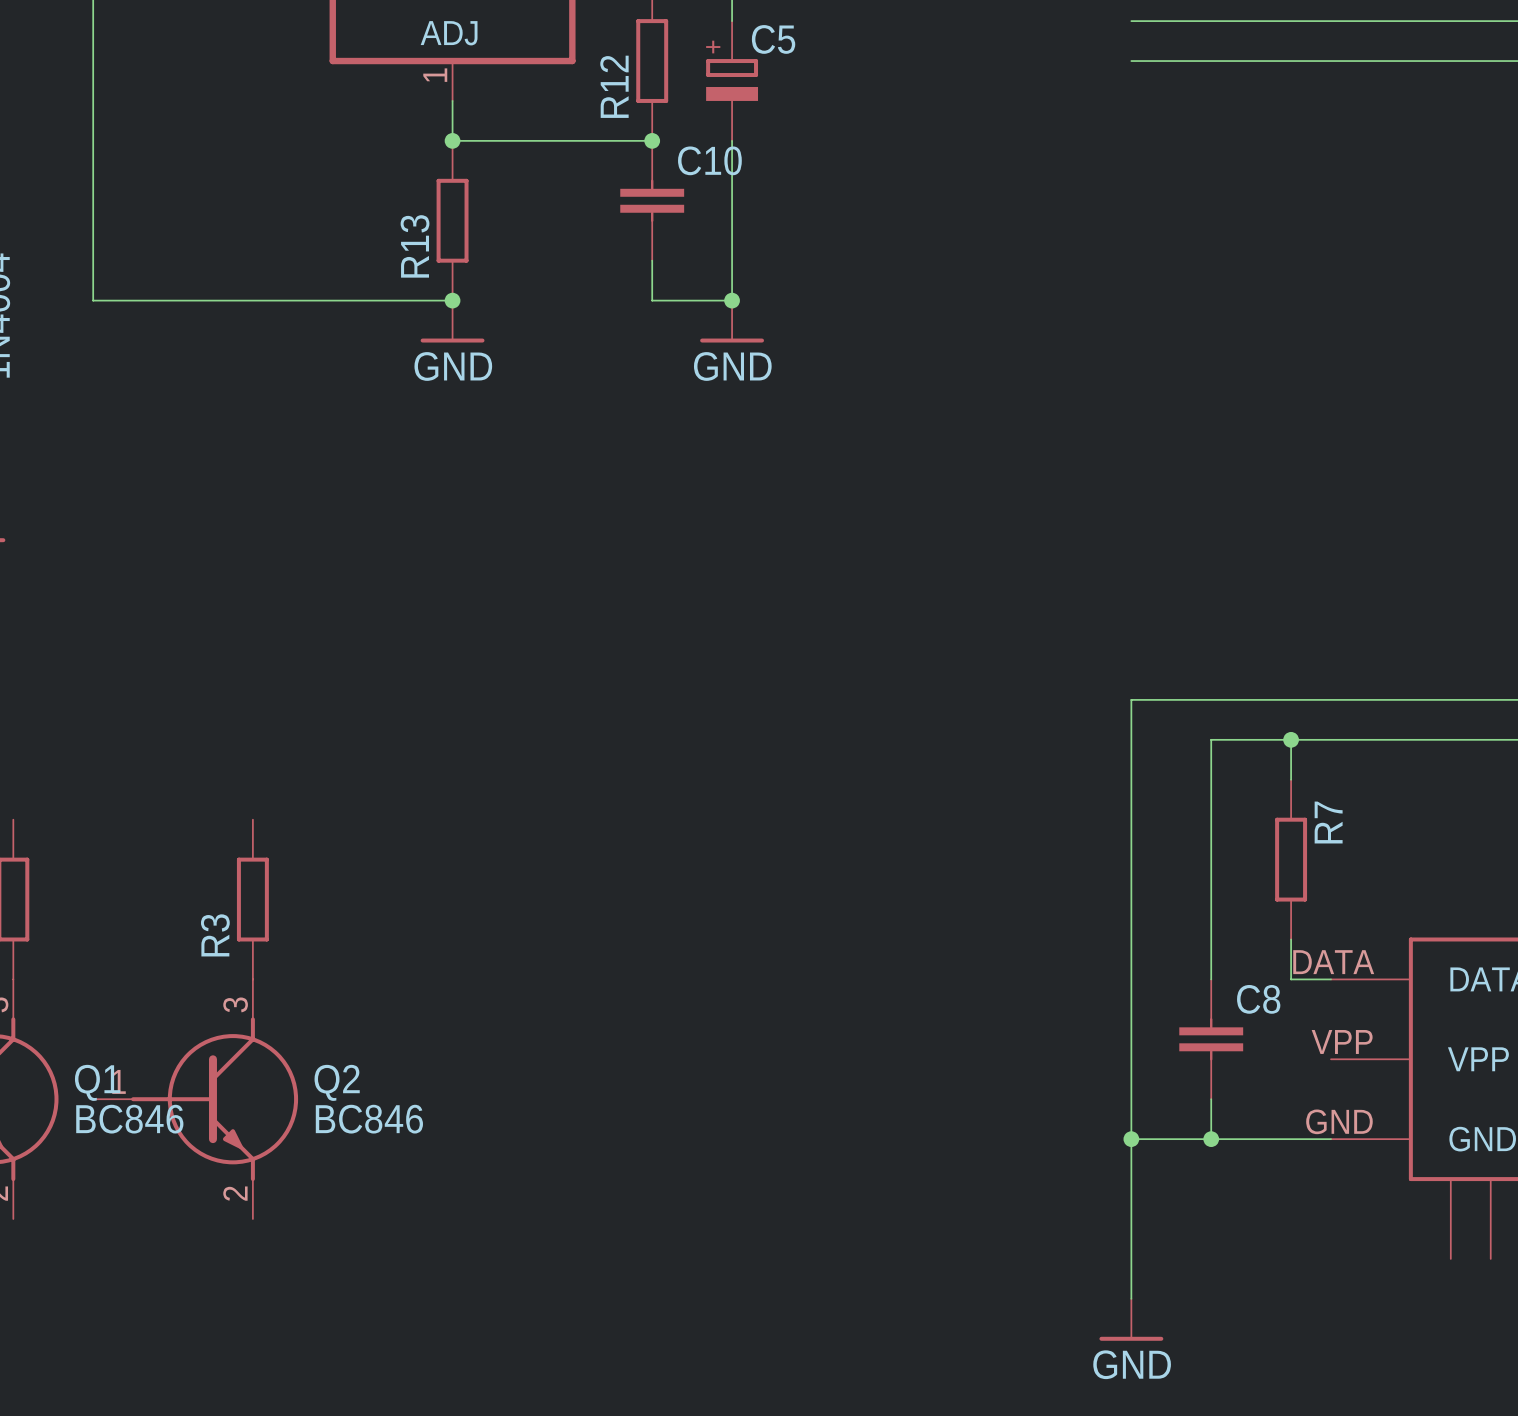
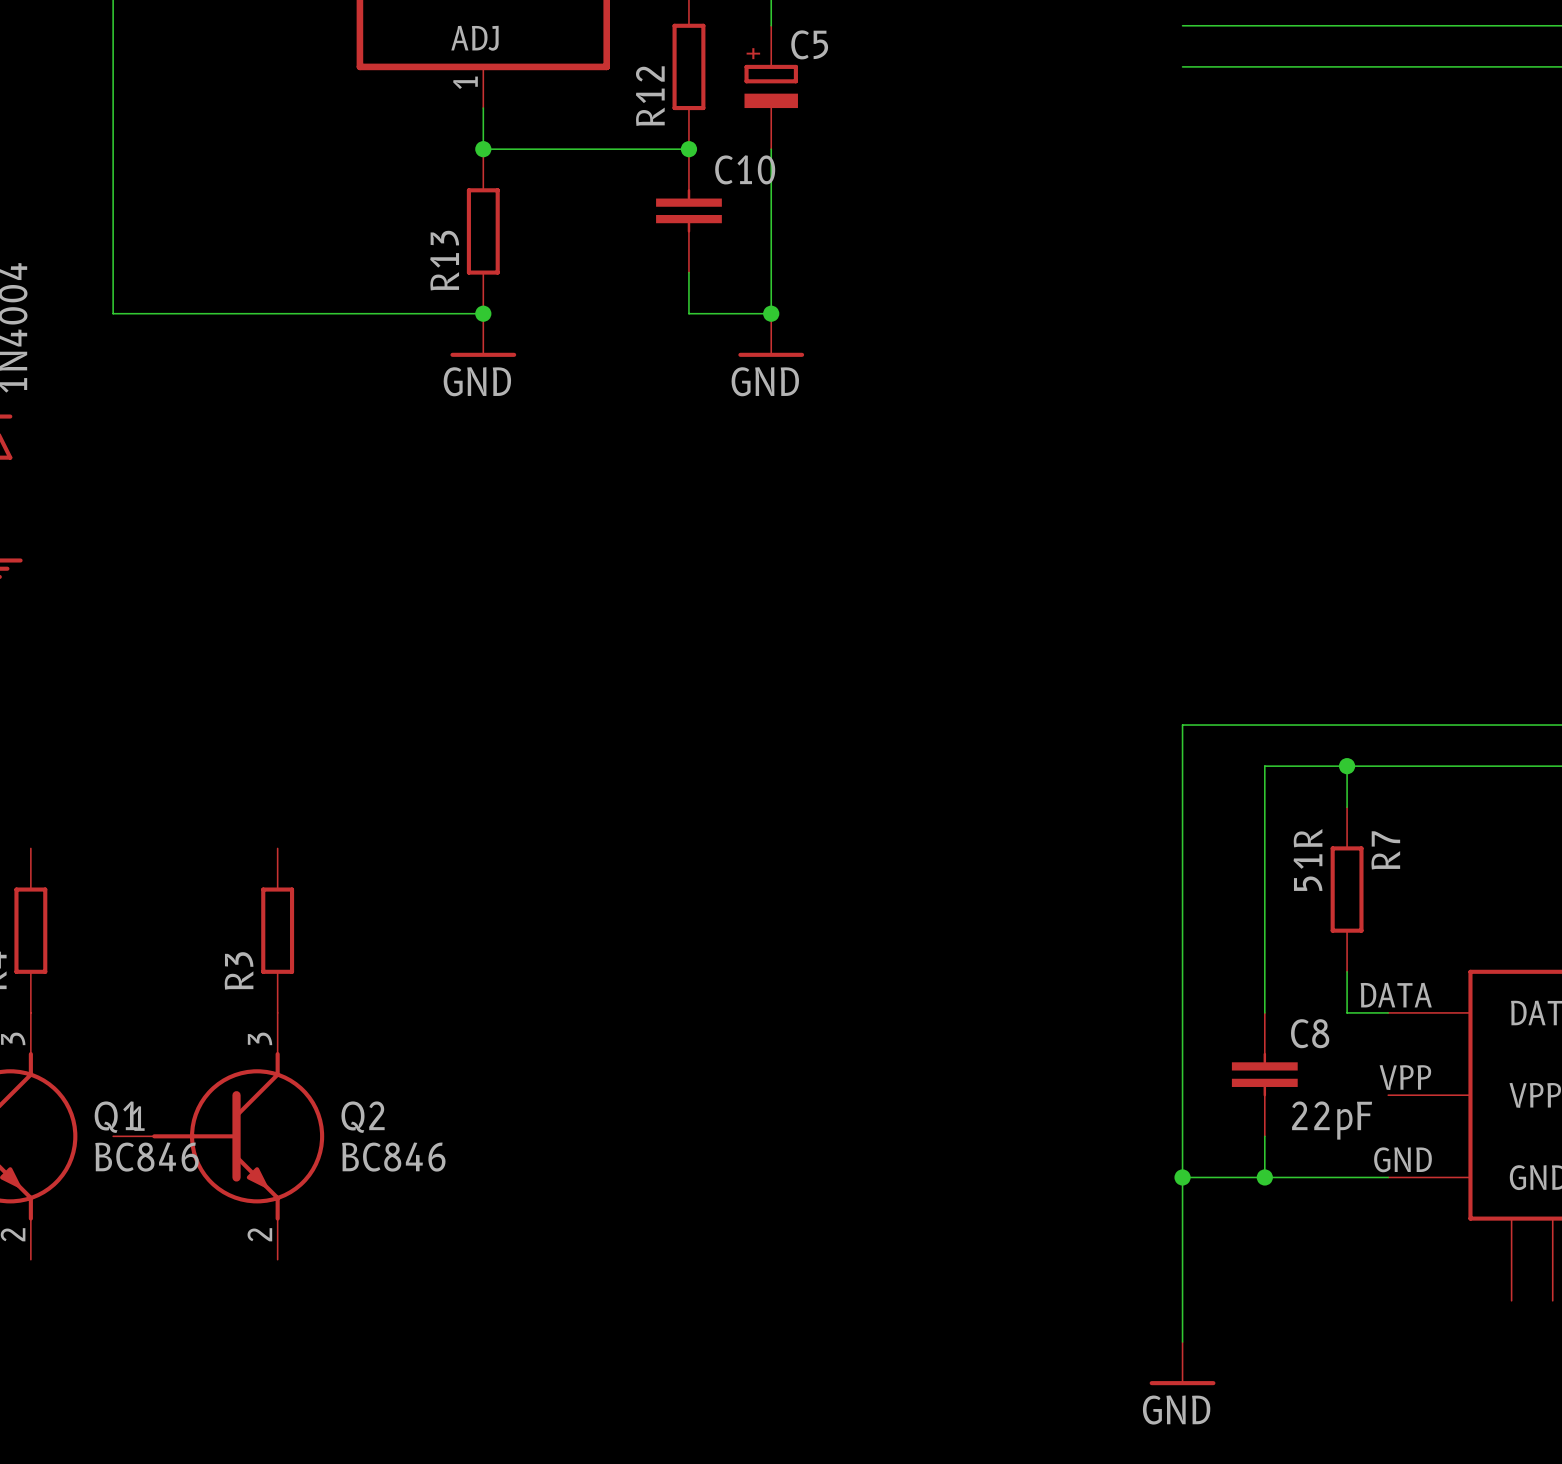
R7 value: none -> 51R (1308, 859)
C8 value: none -> 22pF (1332, 1120)

